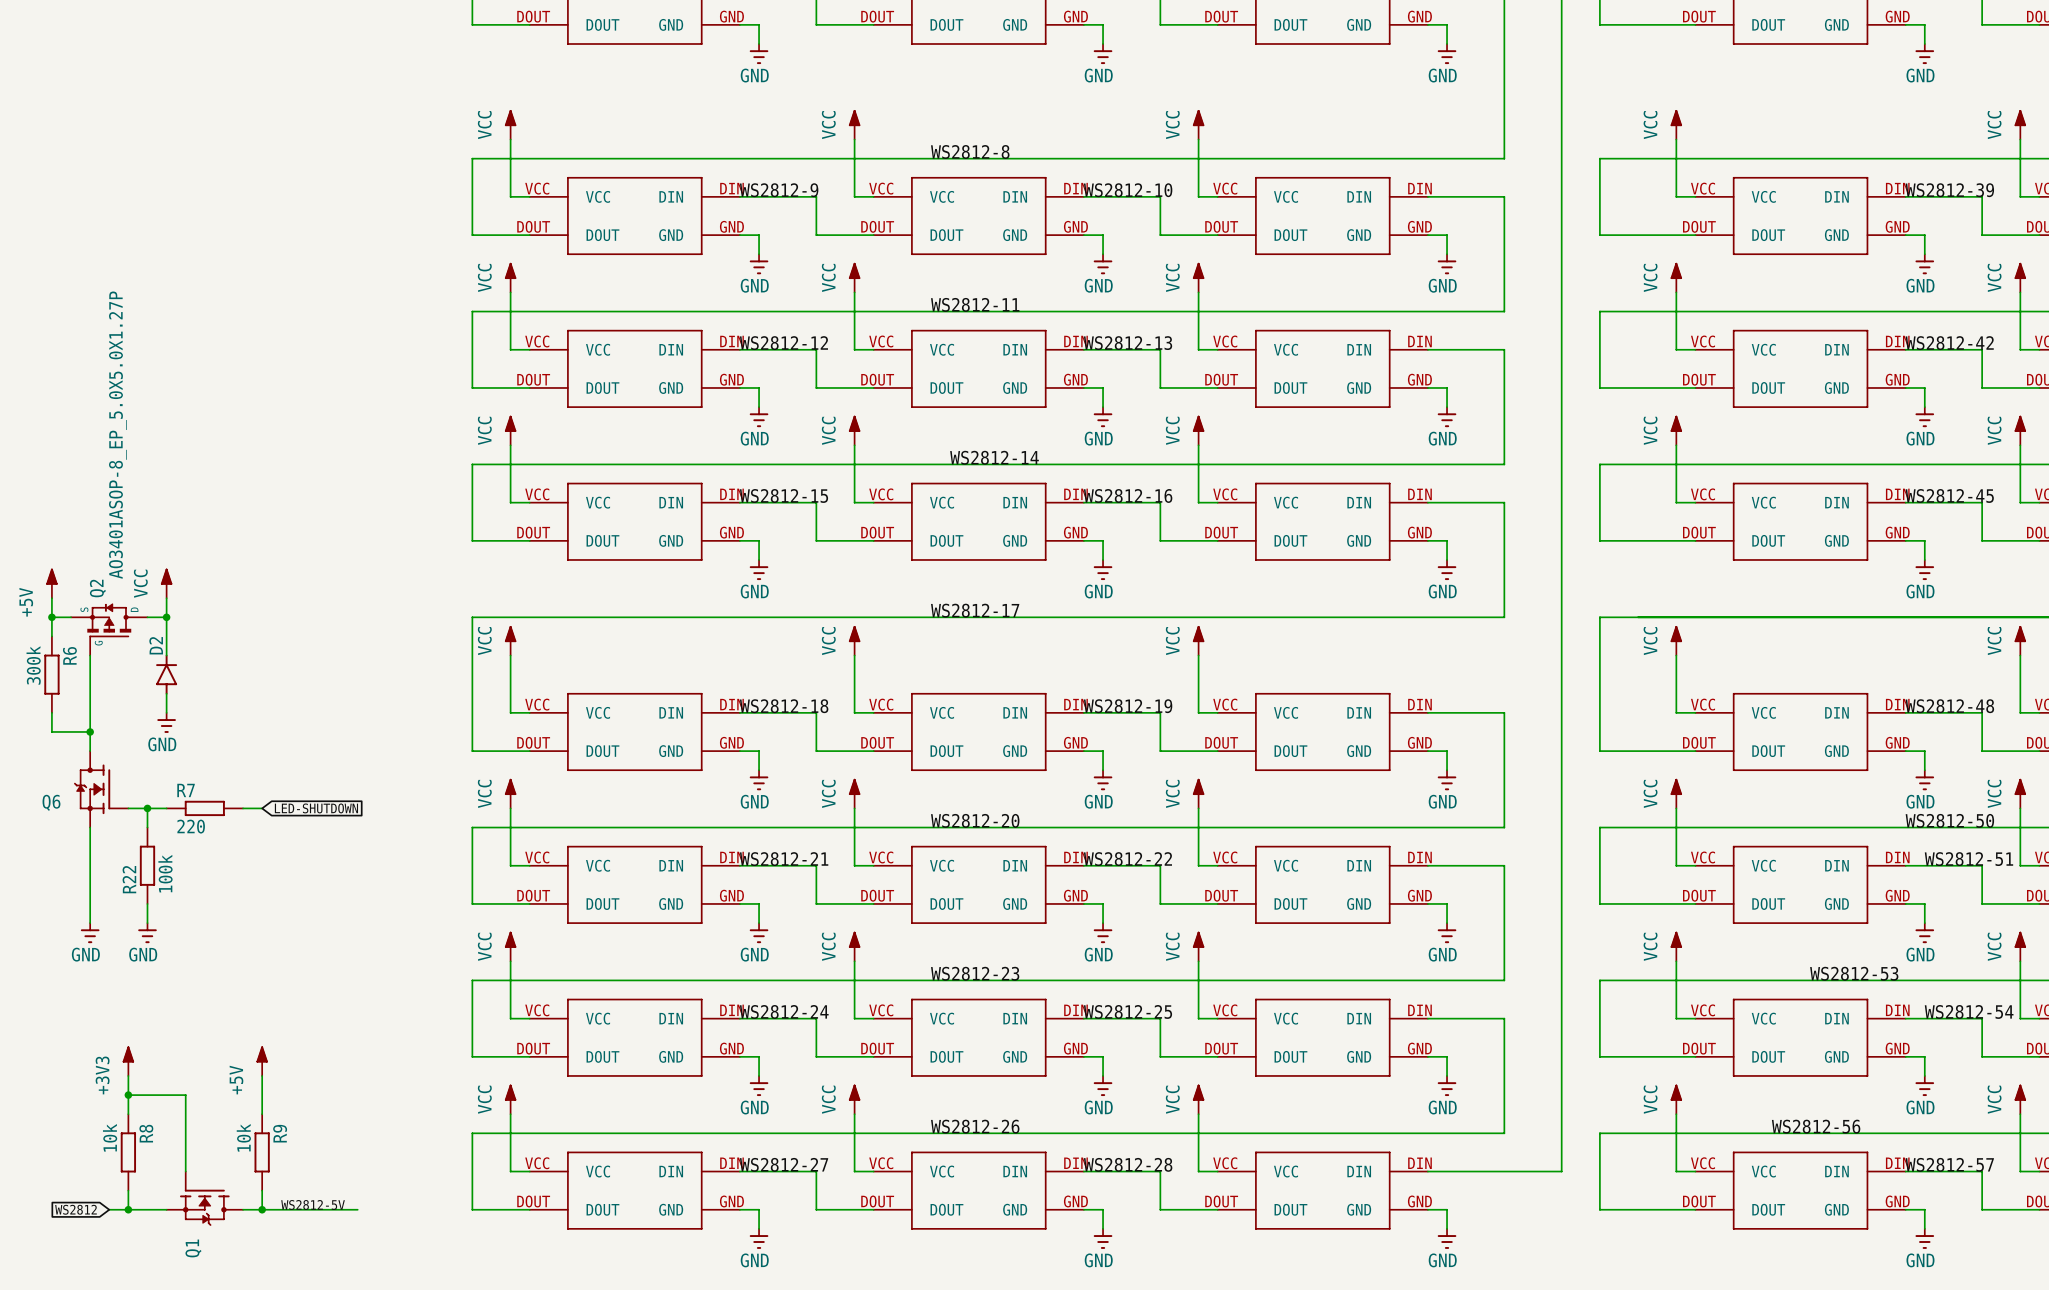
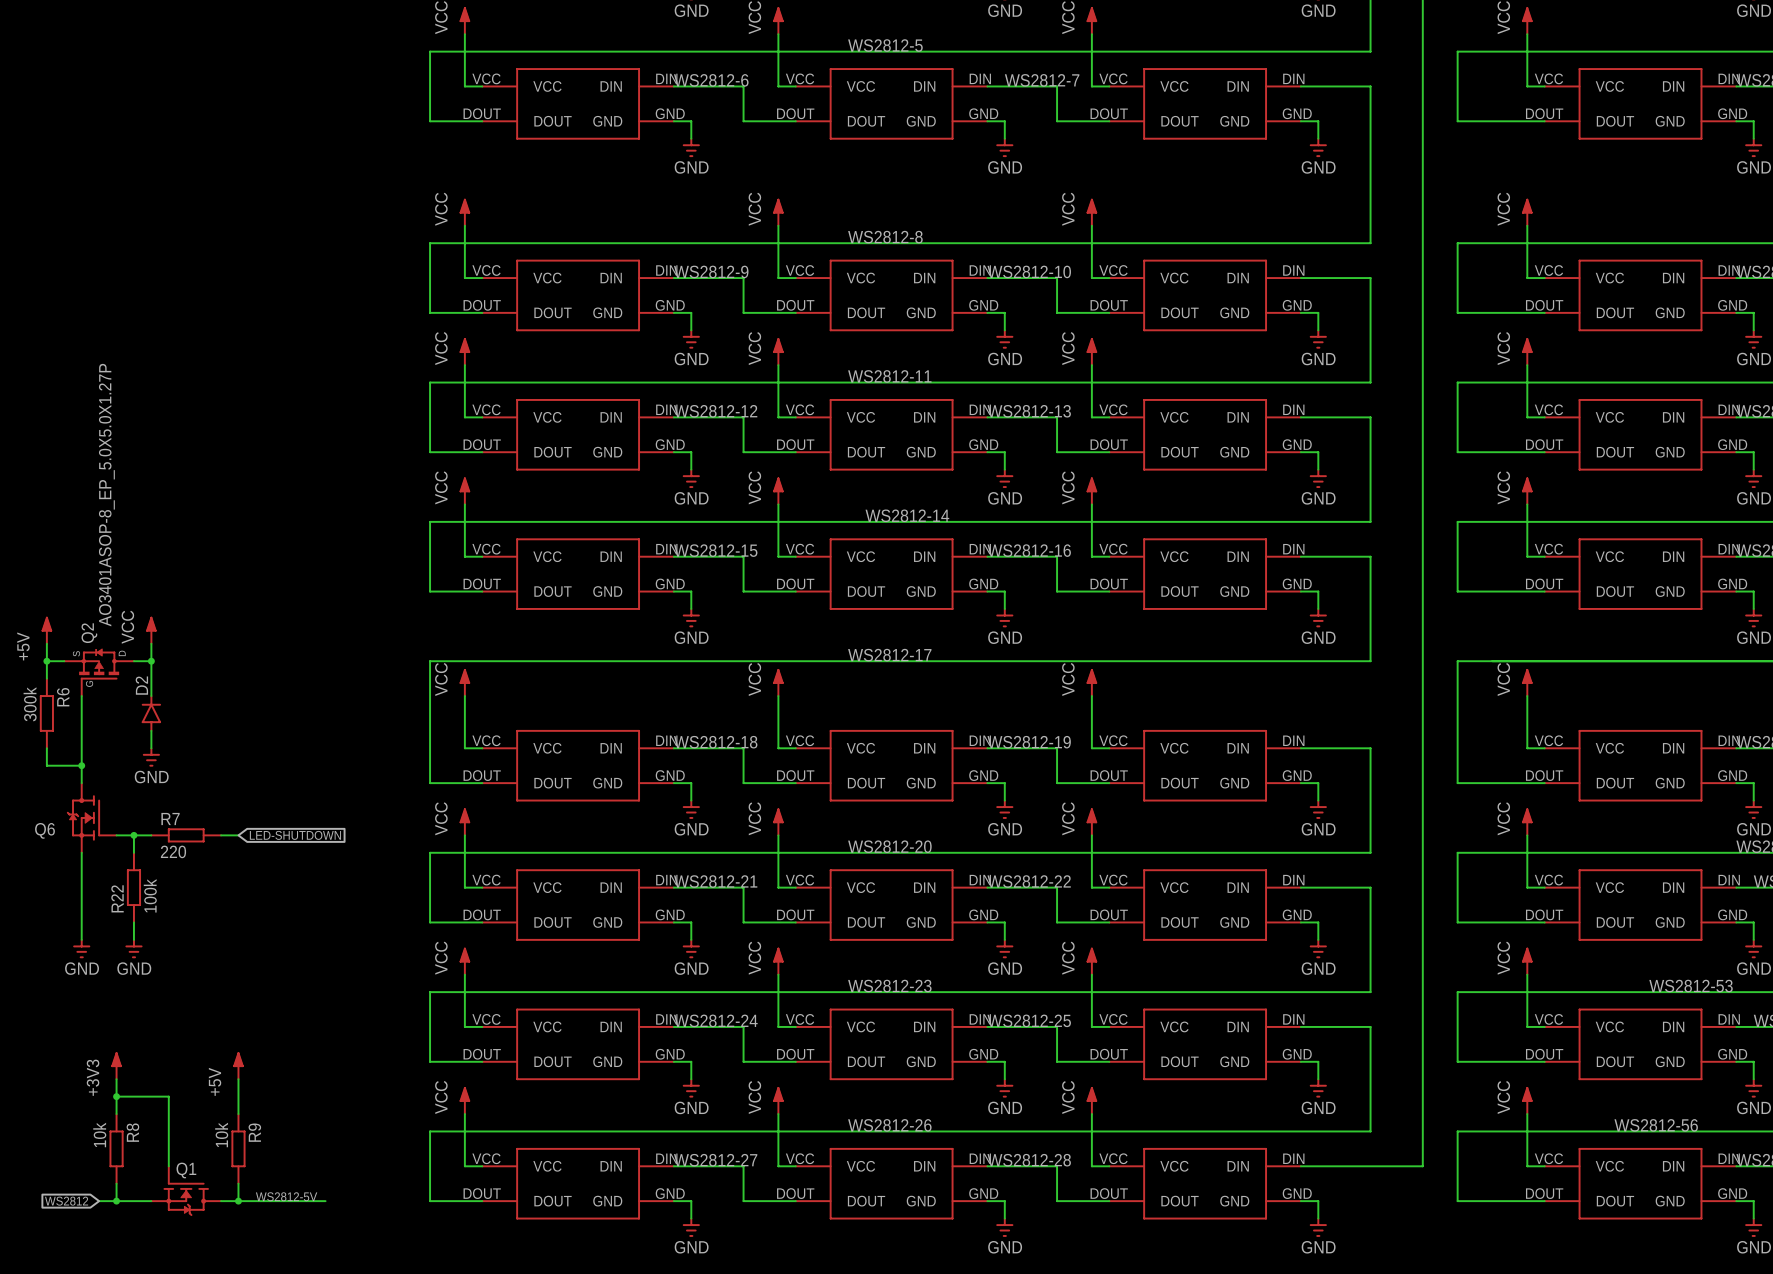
Q1 name rotation: 0° (193, 1248) -> 90° clockwise (186, 1170)
Q1 name position: Q1 (193, 1248) -> Q1 (186, 1170)

